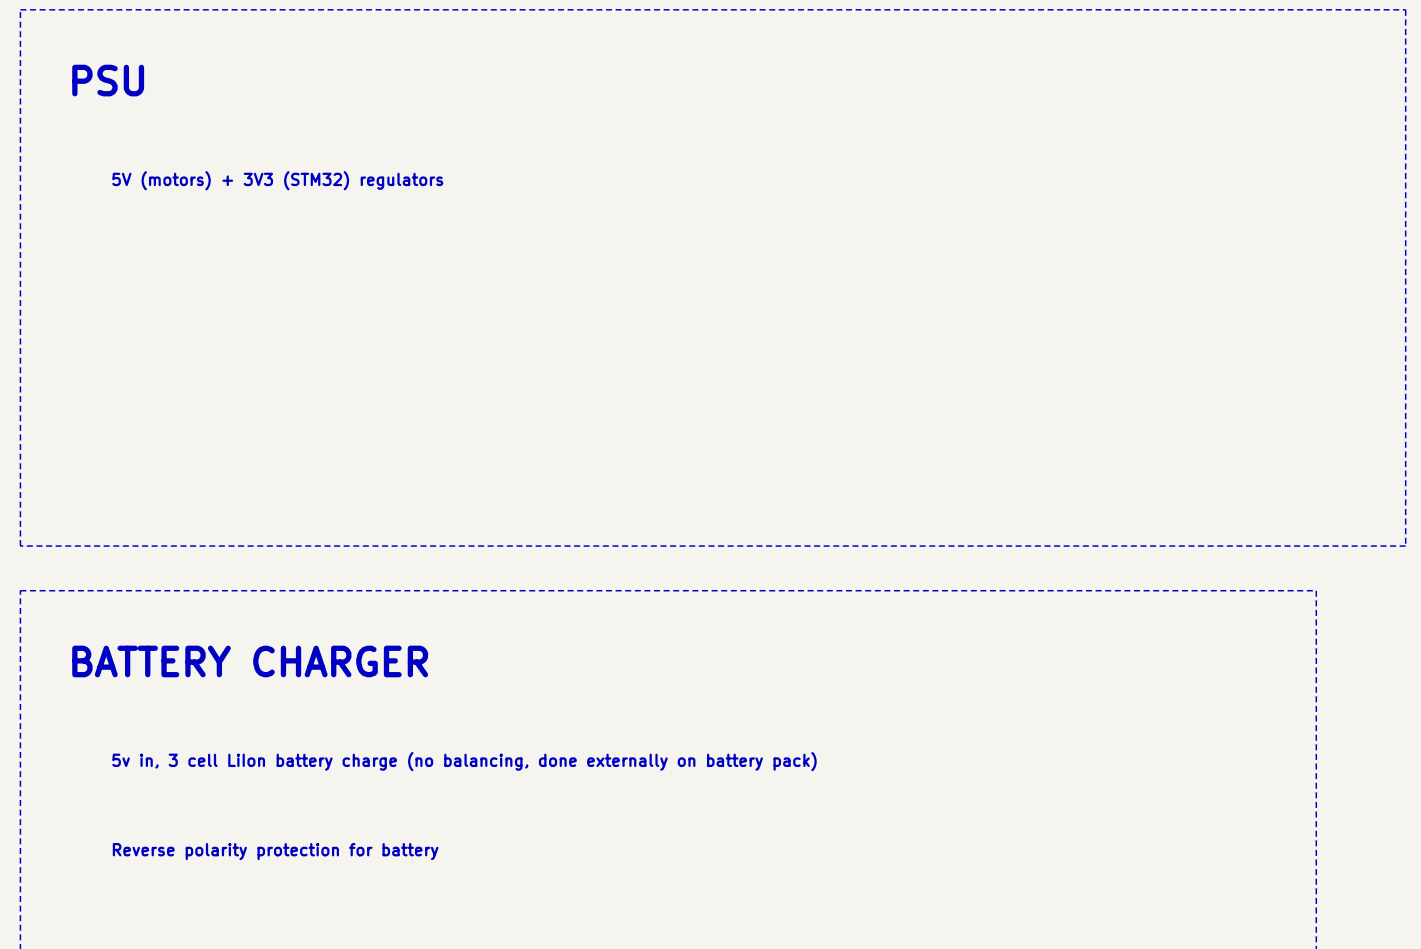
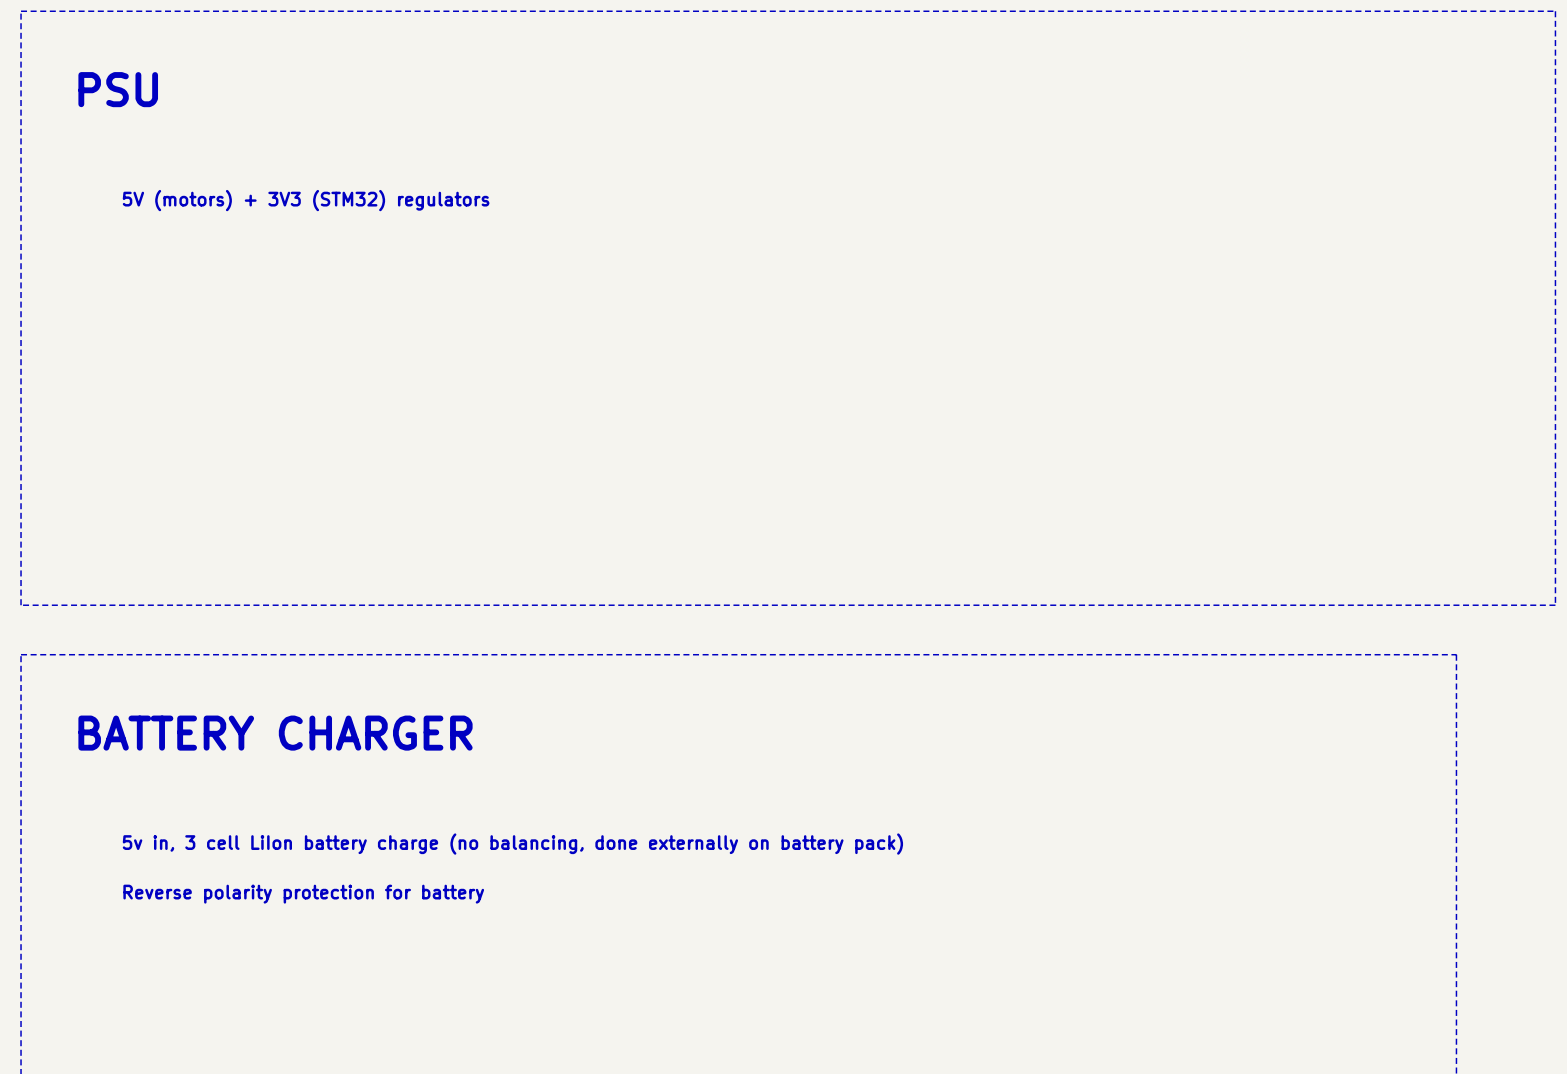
text position: Reverse polarity protection for battery (275, 851) -> Reverse polarity protection for battery (303, 894)

